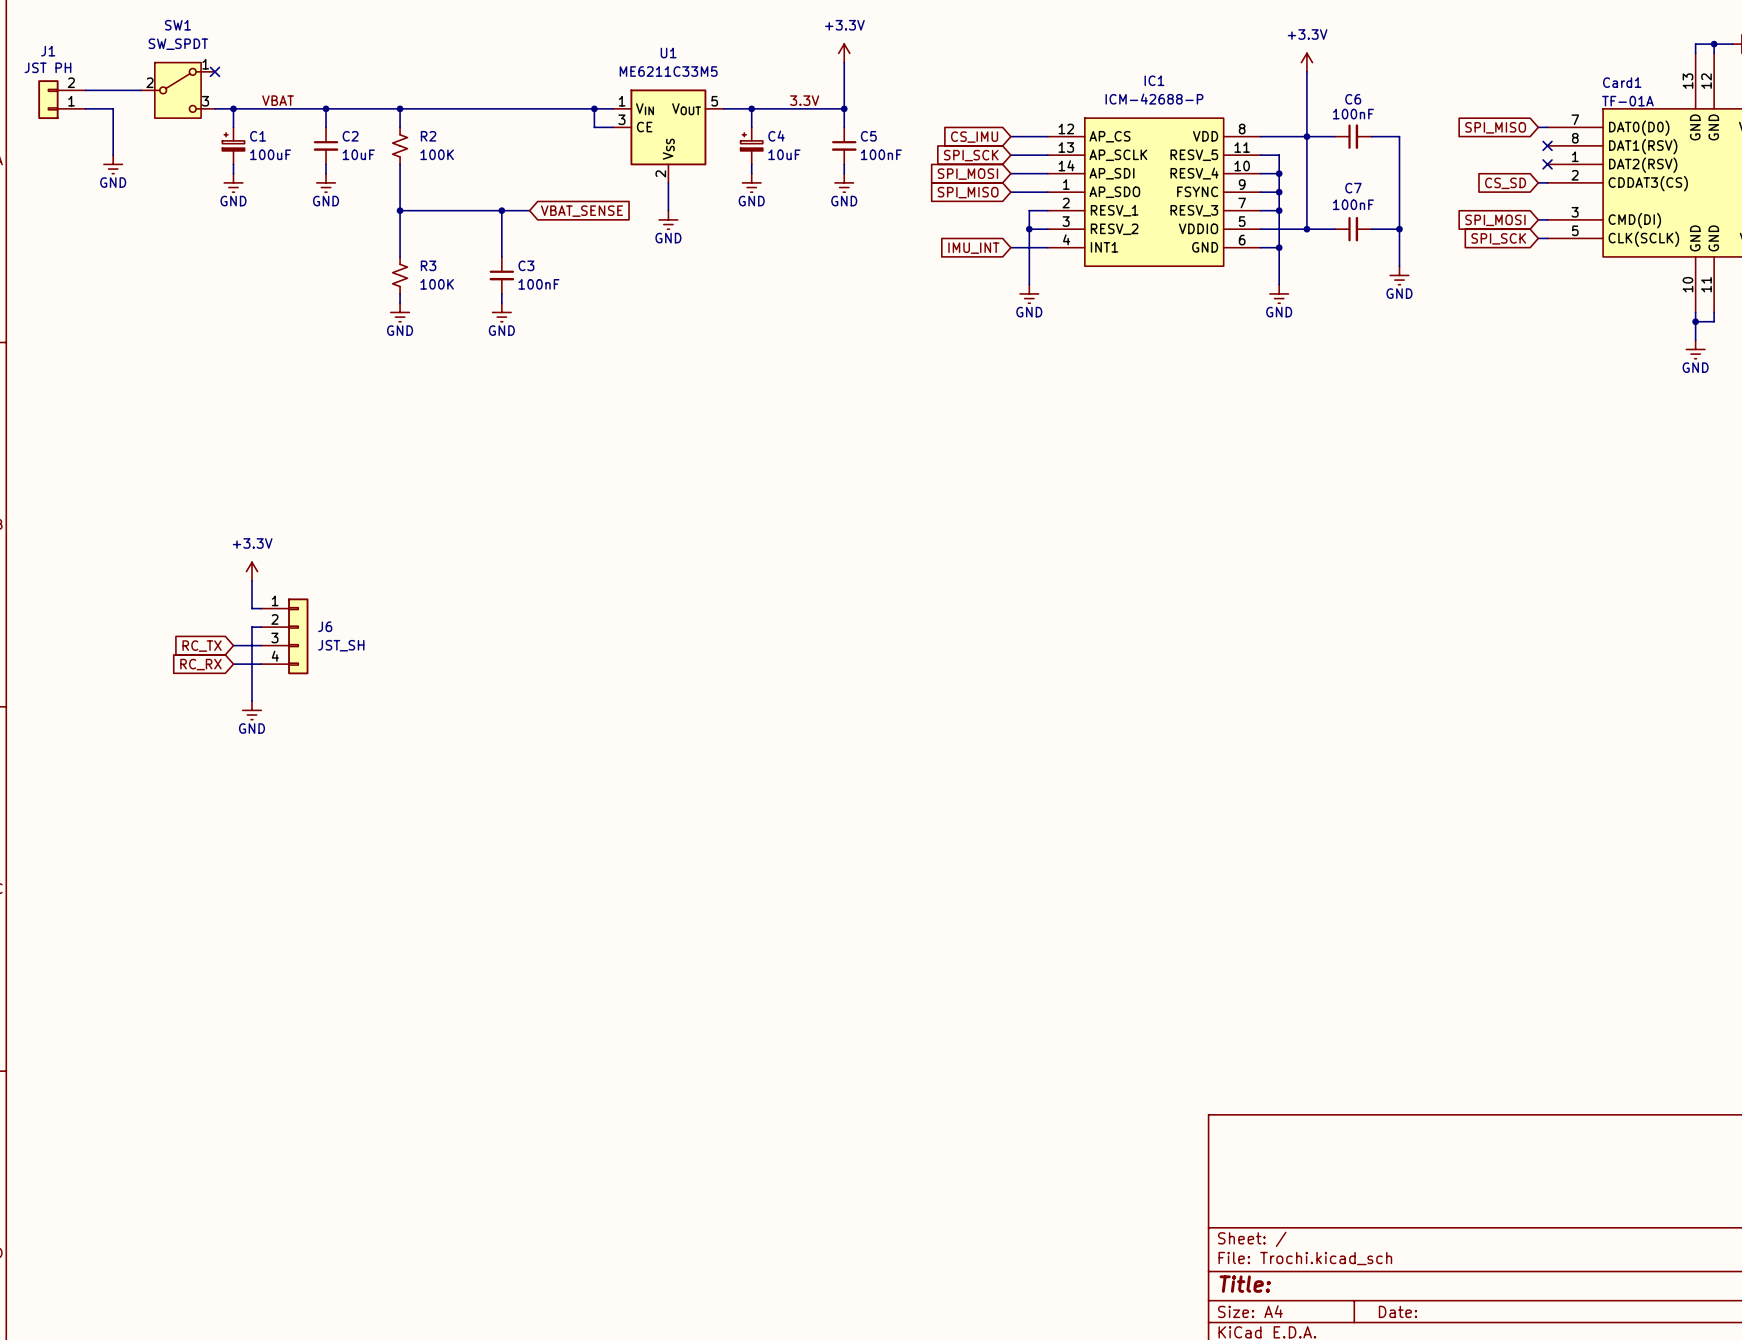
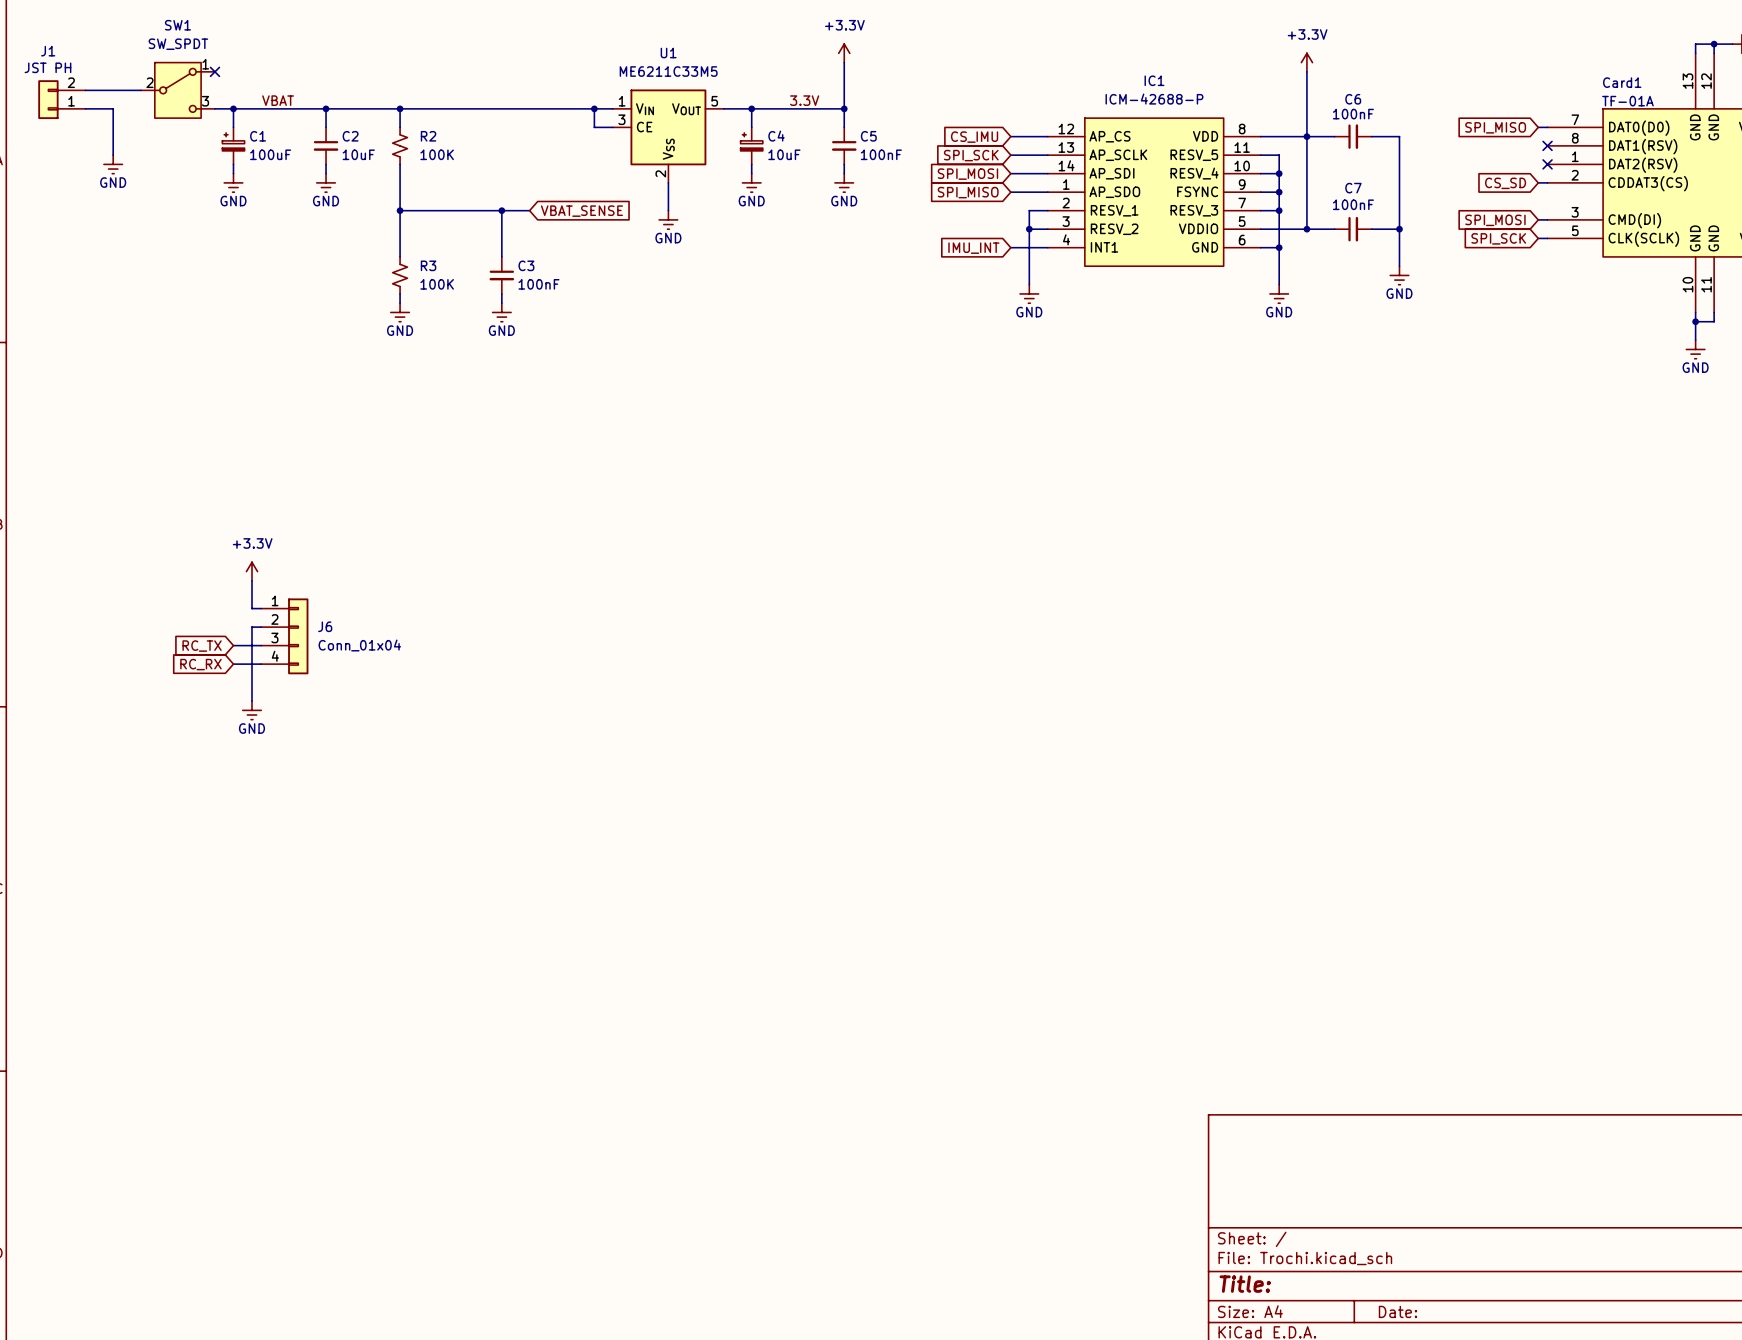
J6 value: JST_SH (341, 645) -> Conn_01x04 (359, 645)

